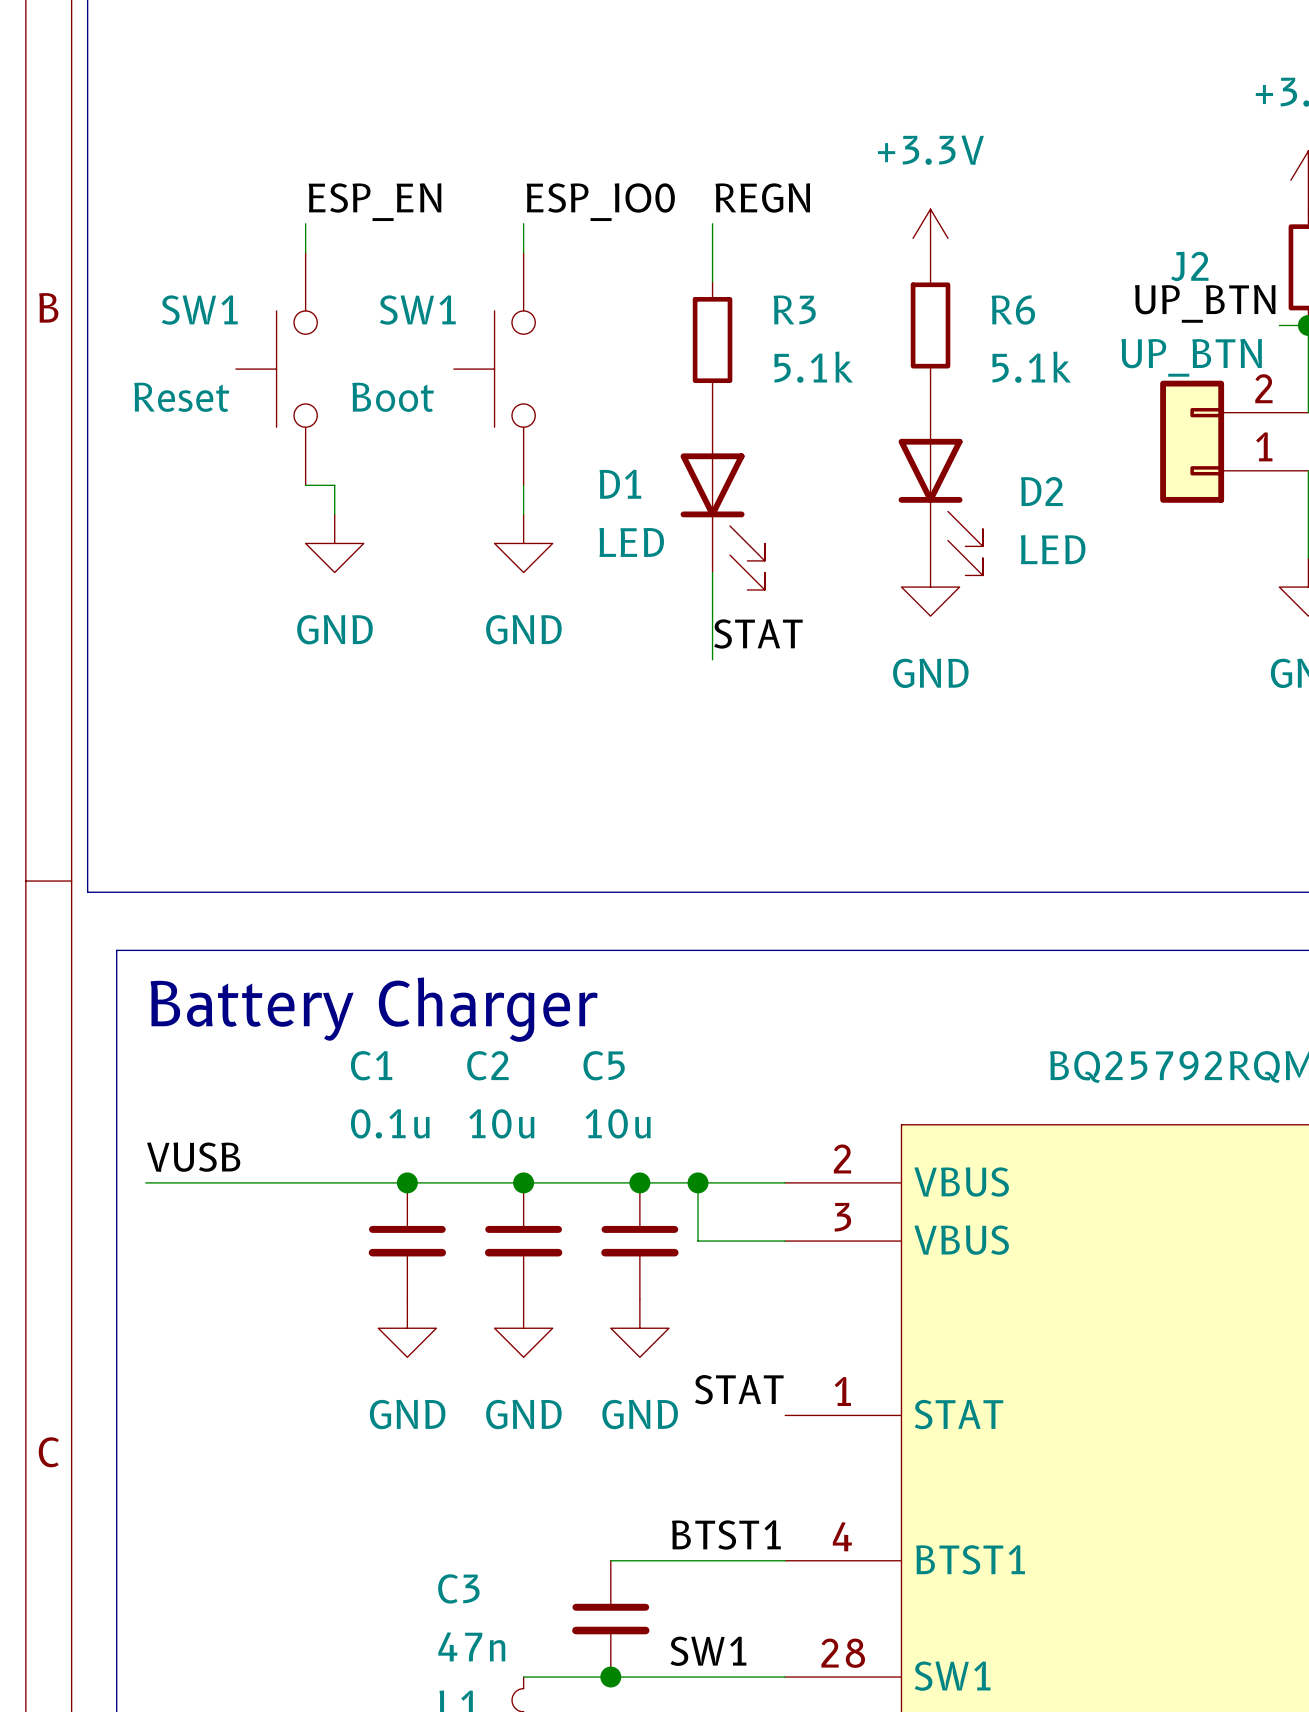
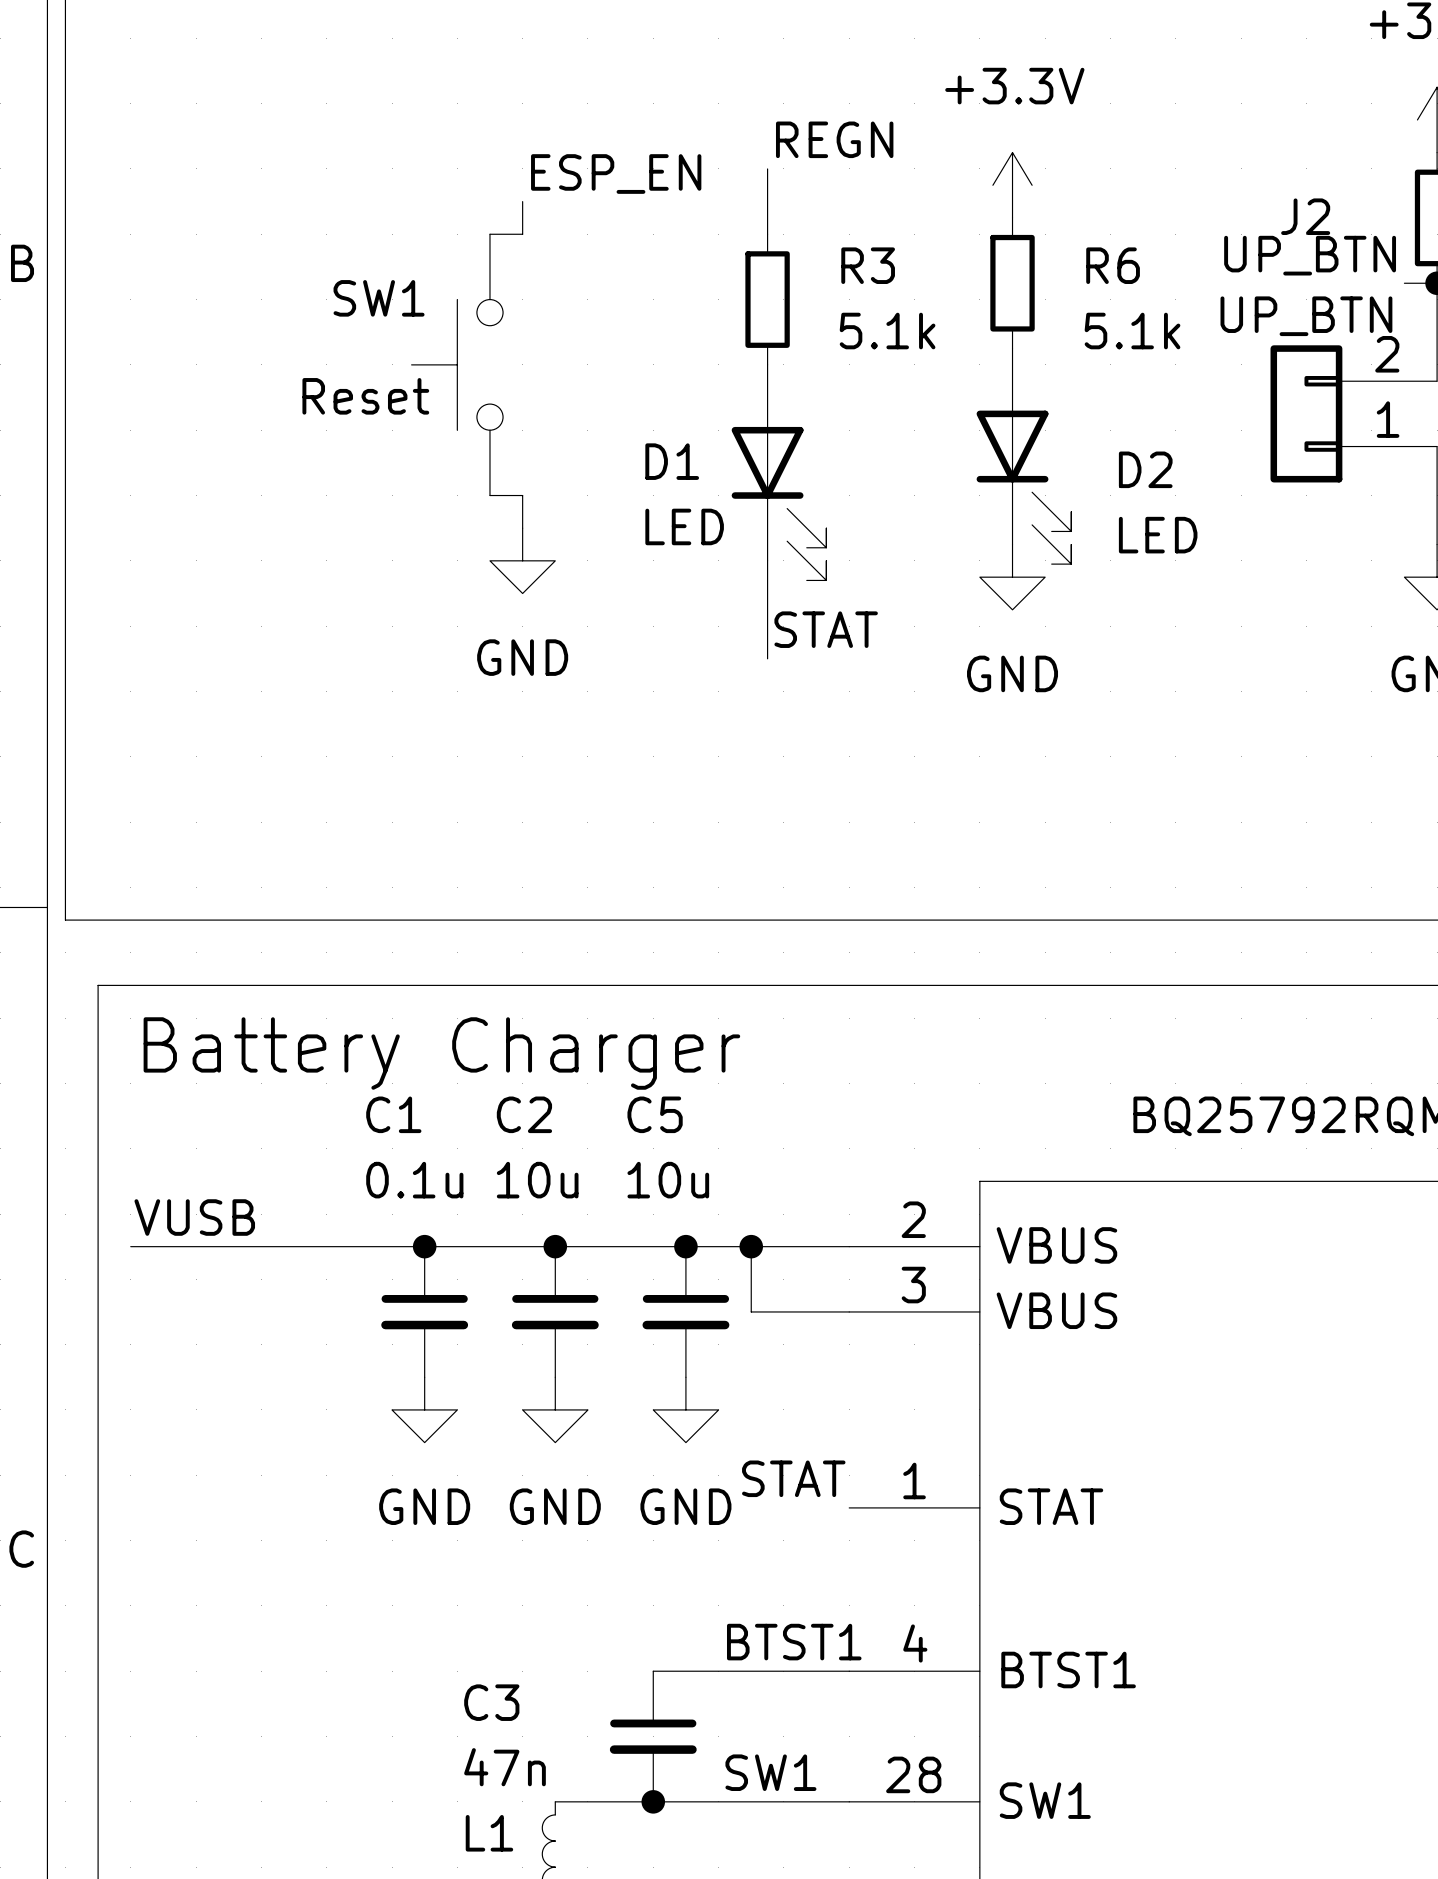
label position: ESP_EN (374, 202) -> ESP_EN (616, 174)
label: ESP_IO0 (600, 202) -> none
wire: (305, 223) (305, 252) -> none
wire: (523, 223) (523, 252) -> none
wire: none -> (522, 201) (522, 234) (489, 234)
SW1 position: (276, 369) -> (457, 364)
SW1: Boot (494, 369) -> none
wire: (305, 485) (334, 485) (334, 514) -> (489, 495) (522, 495) (522, 528)
wire: (523, 485) (523, 514) -> none
power symbol: GND (334, 543) -> none
power symbol position: GND (523, 543) -> GND (522, 560)

